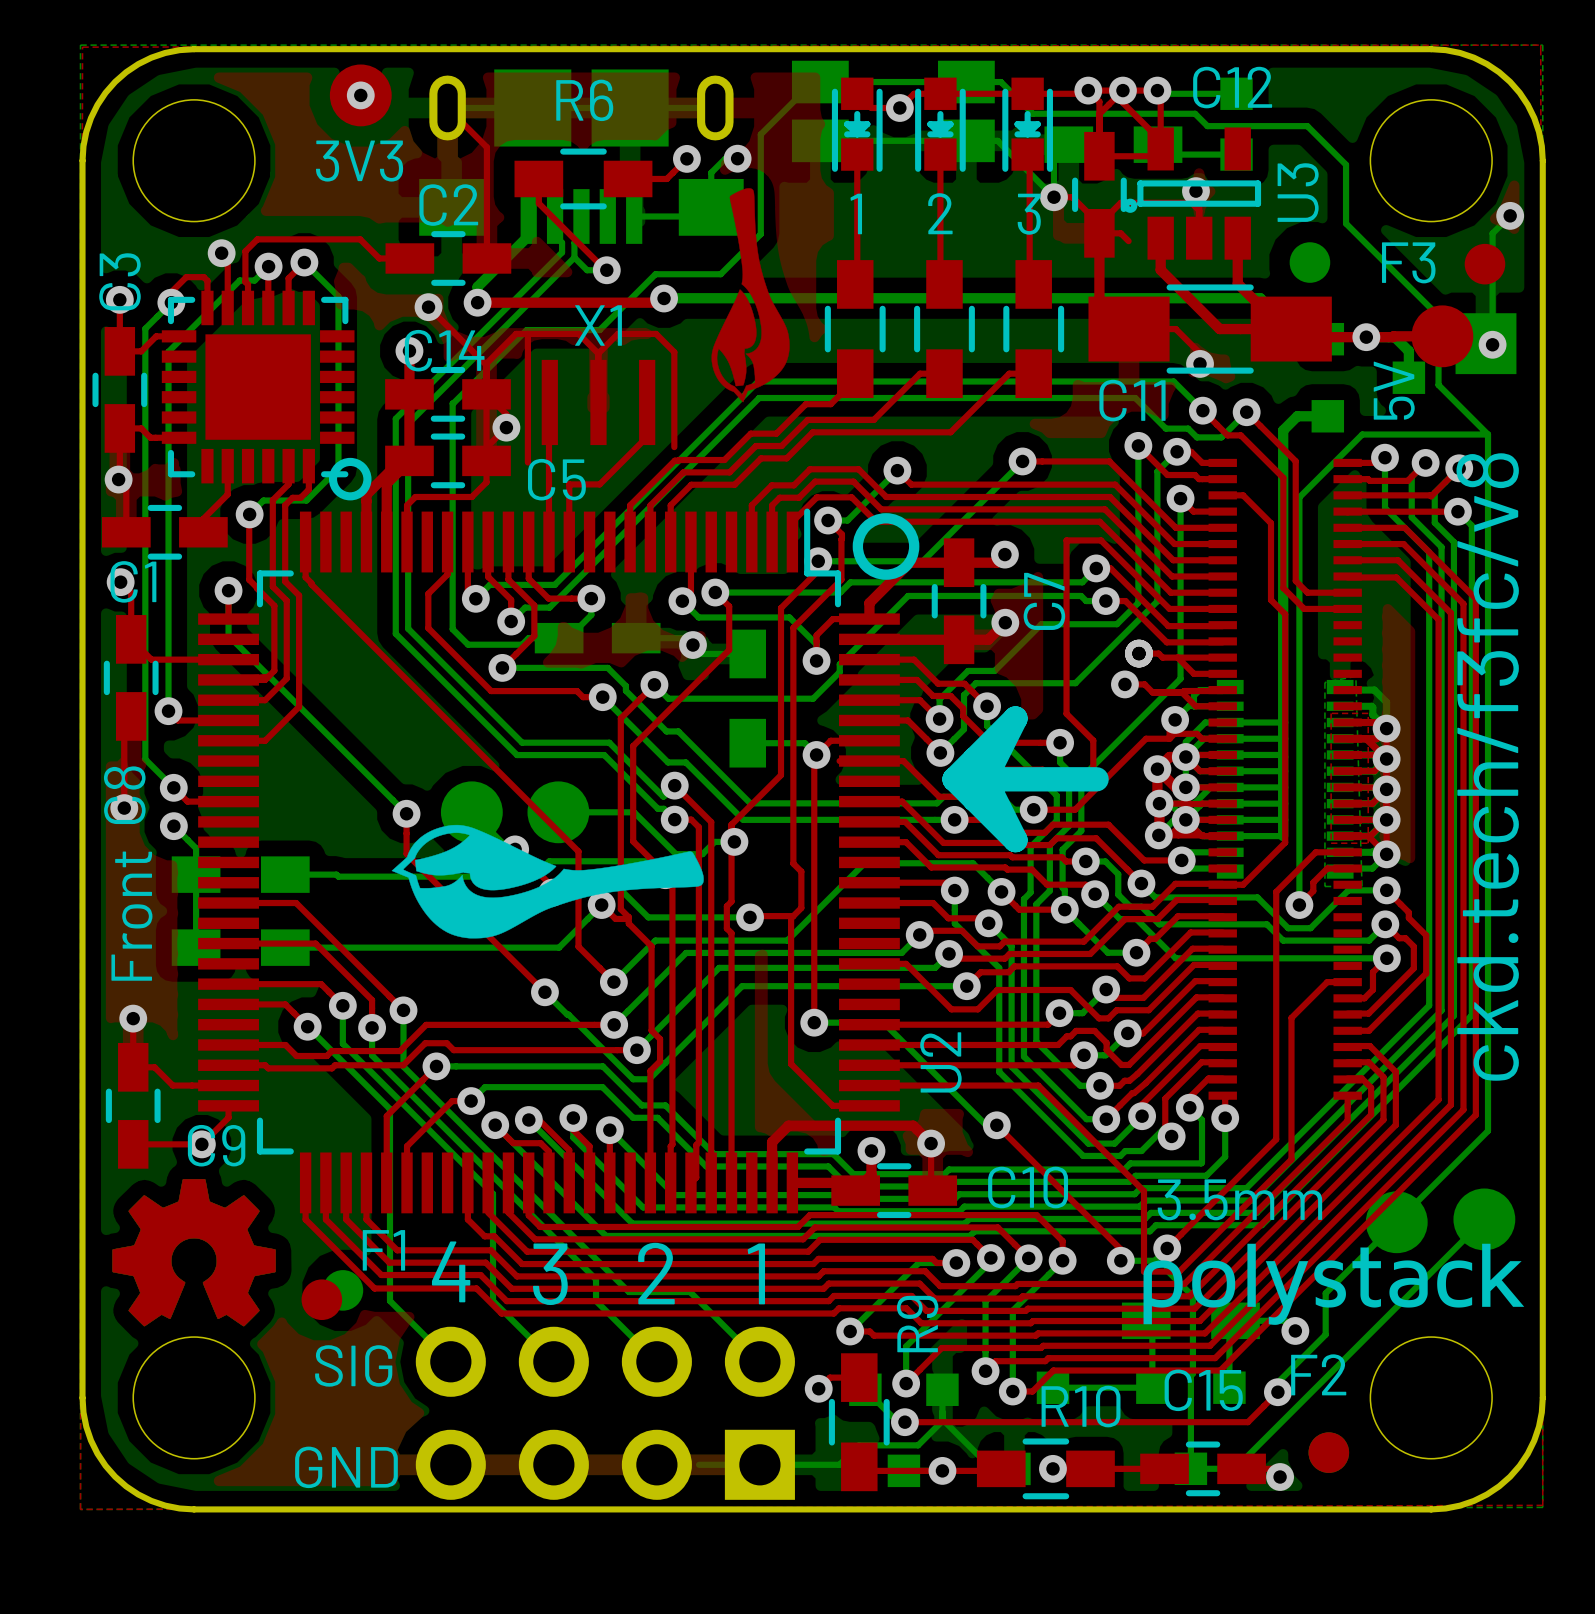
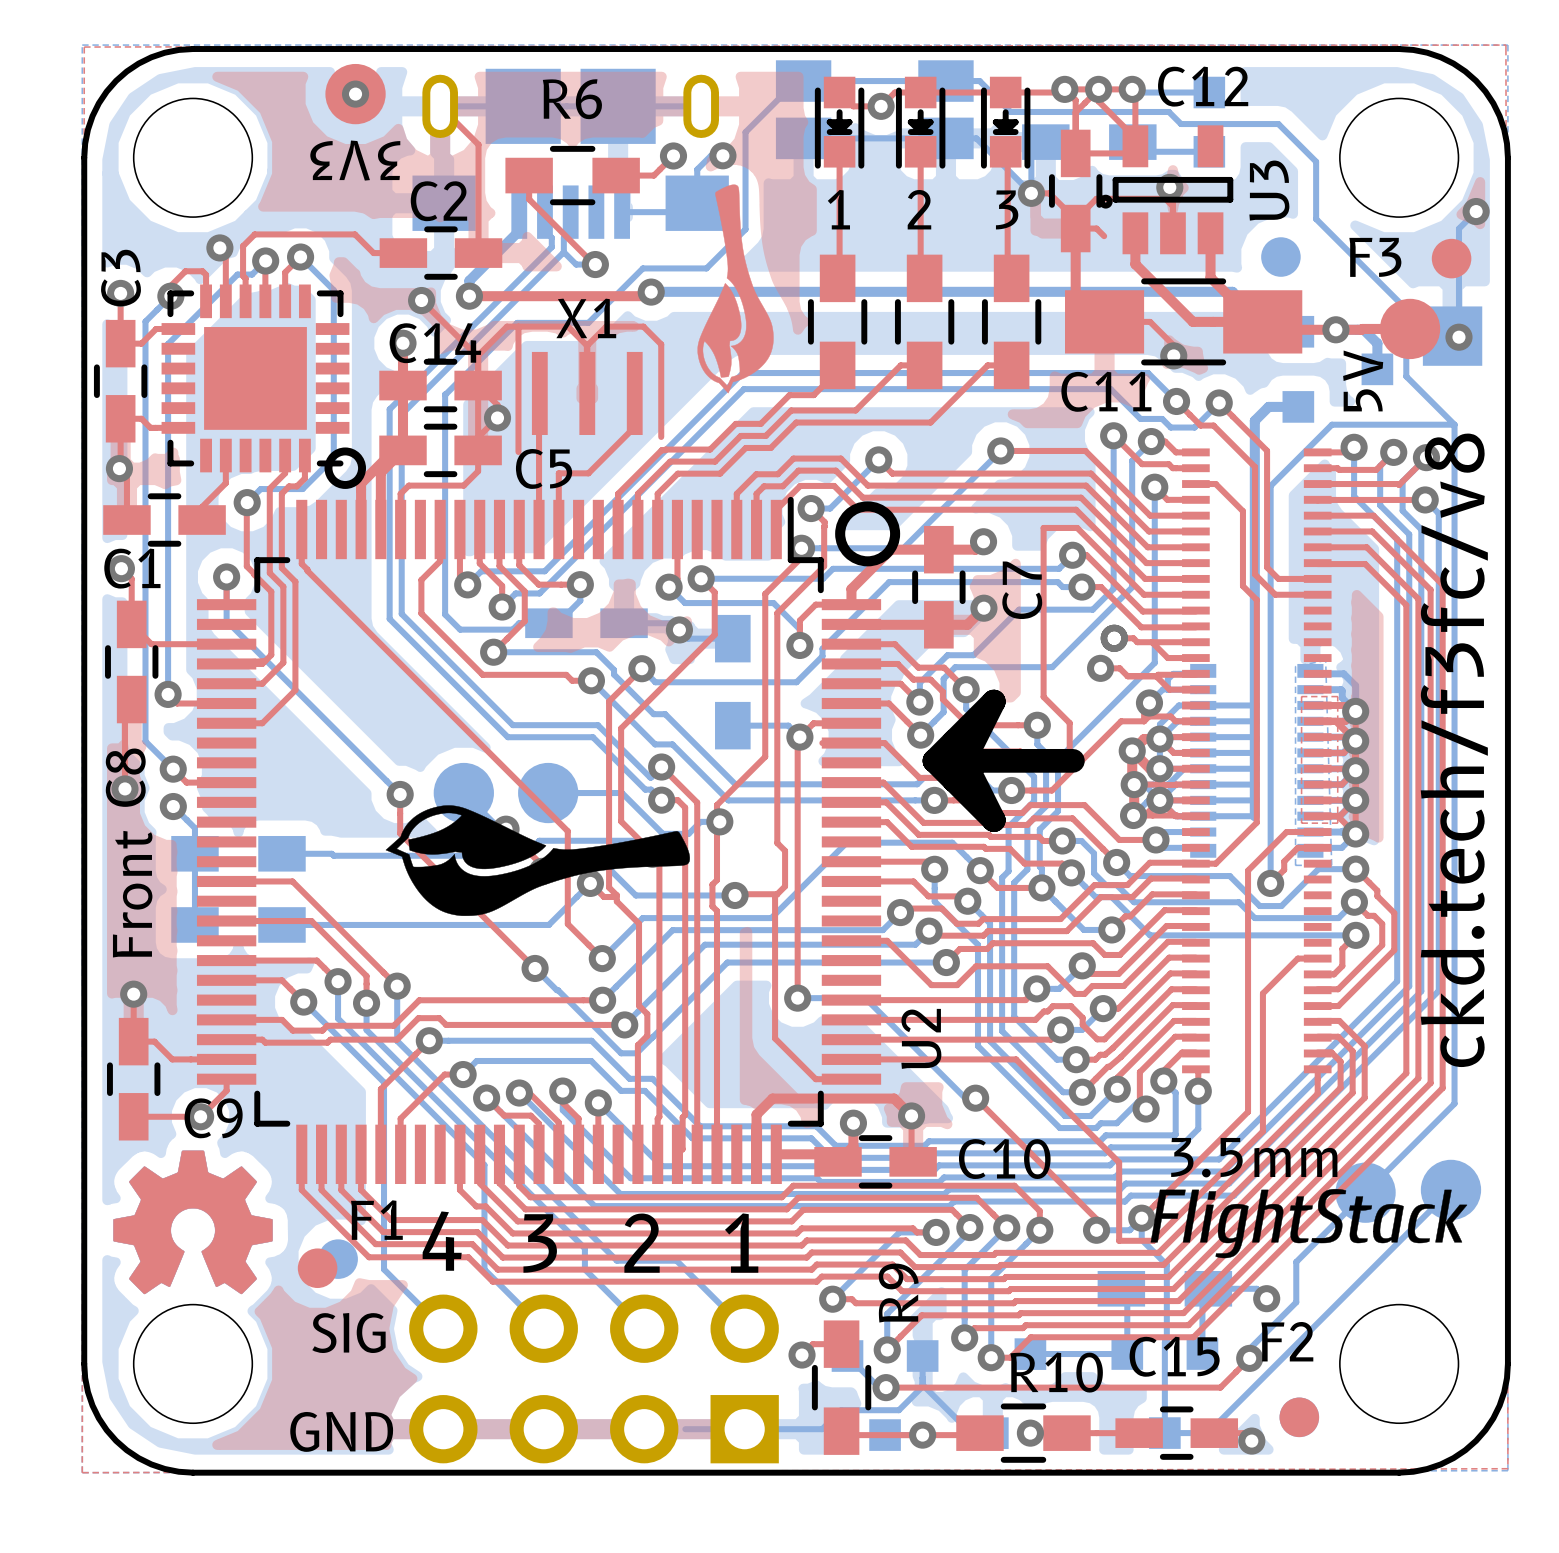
text rotation: 0° (359, 161) -> 180° (355, 160)
text position: 3.5mm (1239, 1199) -> 3.5mm (1254, 1157)
drawing shape: [1143, 1243, 1525, 1325] -> [1150, 1188, 1468, 1259]

